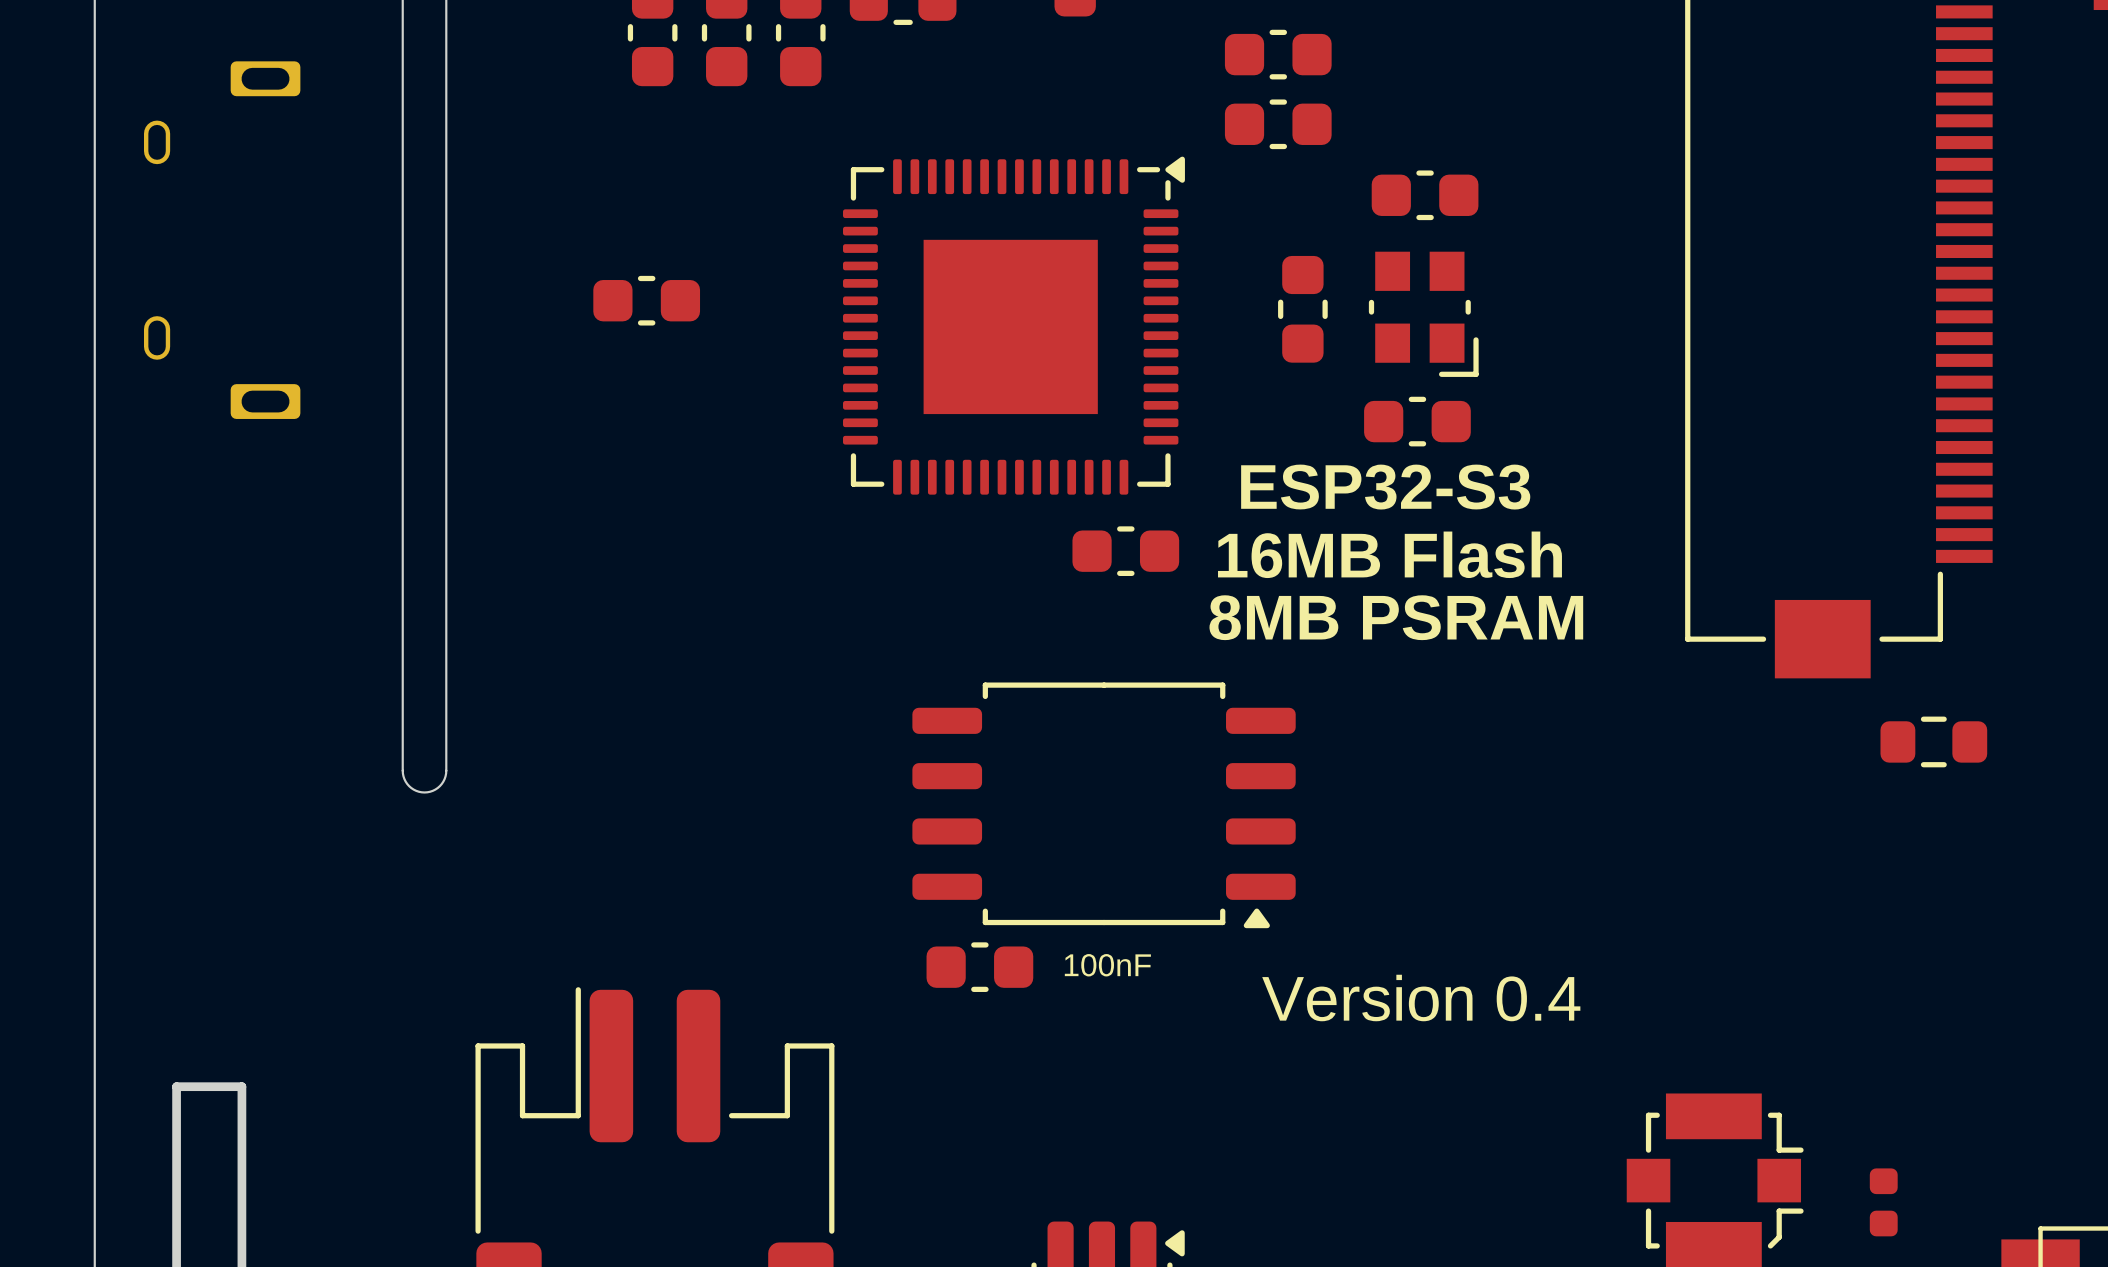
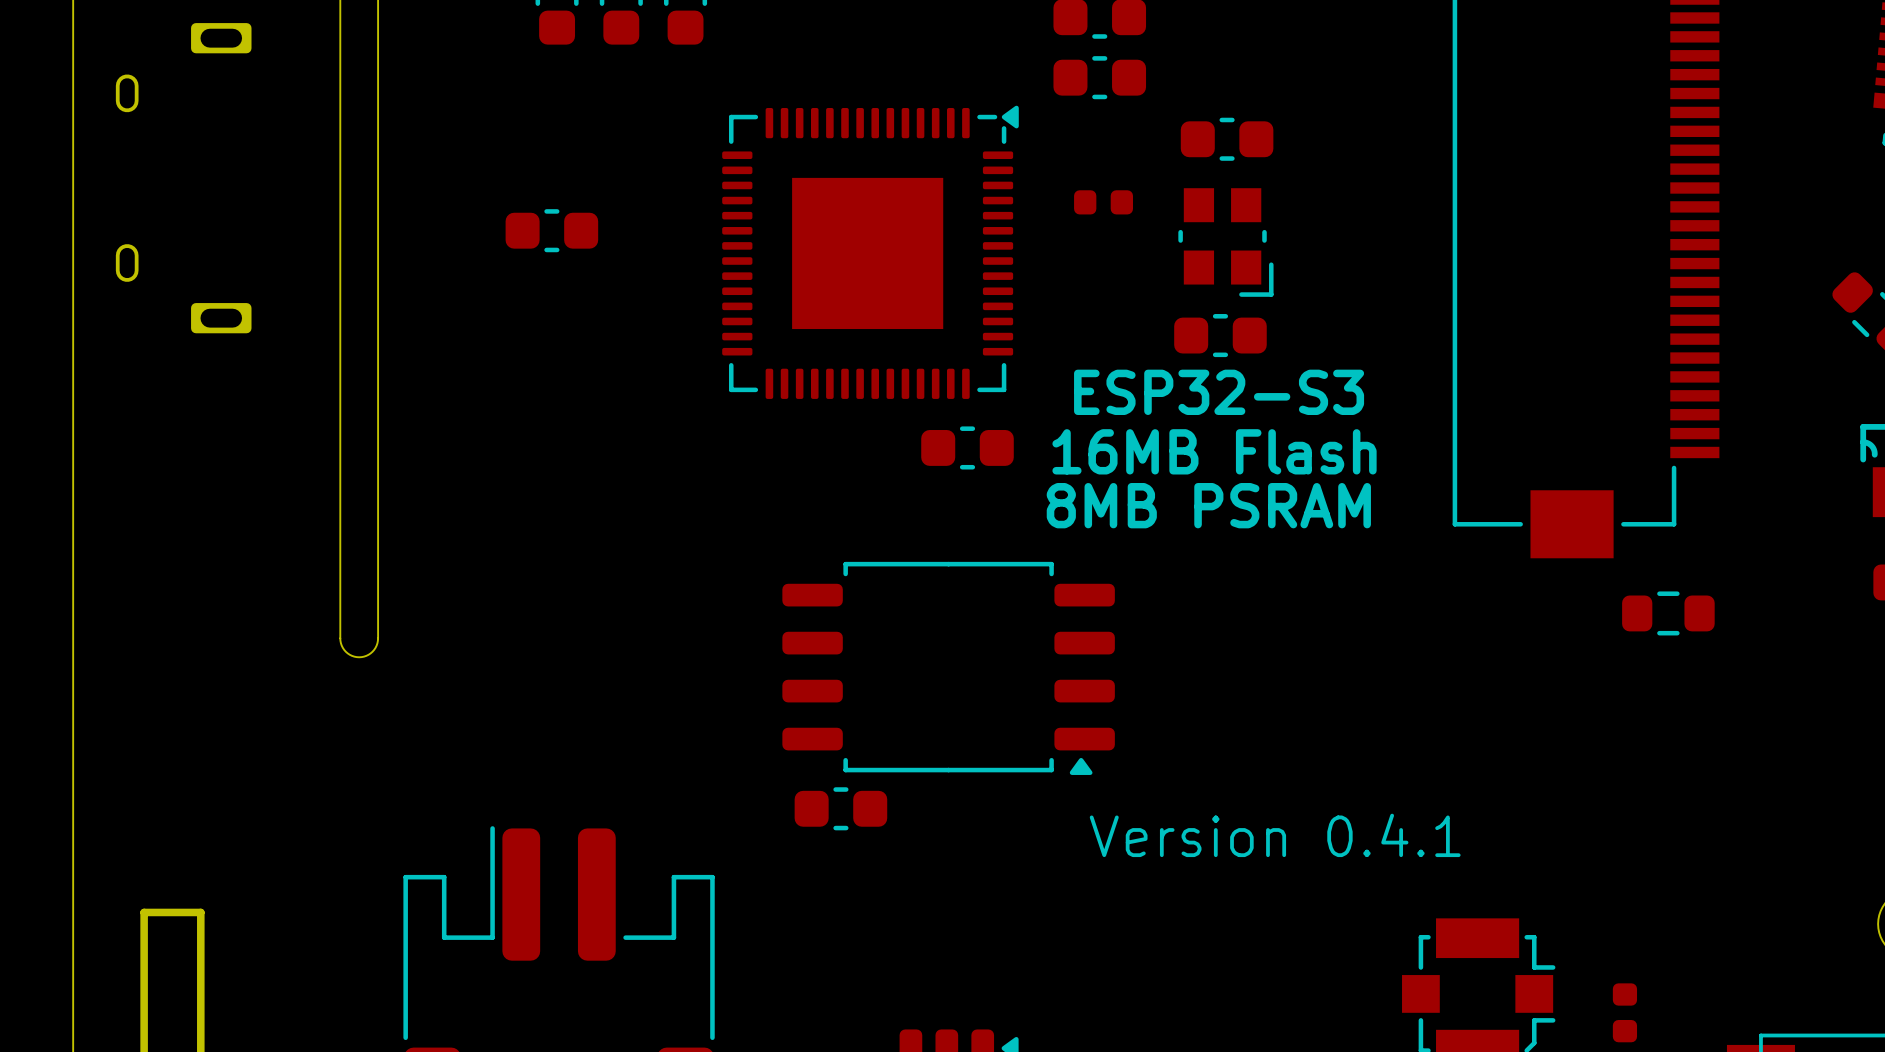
part: none -> (1103, 202)
part: (1302, 309) -> none
100nF name: 100nF (1107, 965) -> none
text: Version 0.4 (1421, 998) -> Version 0.4.1 (1275, 835)

